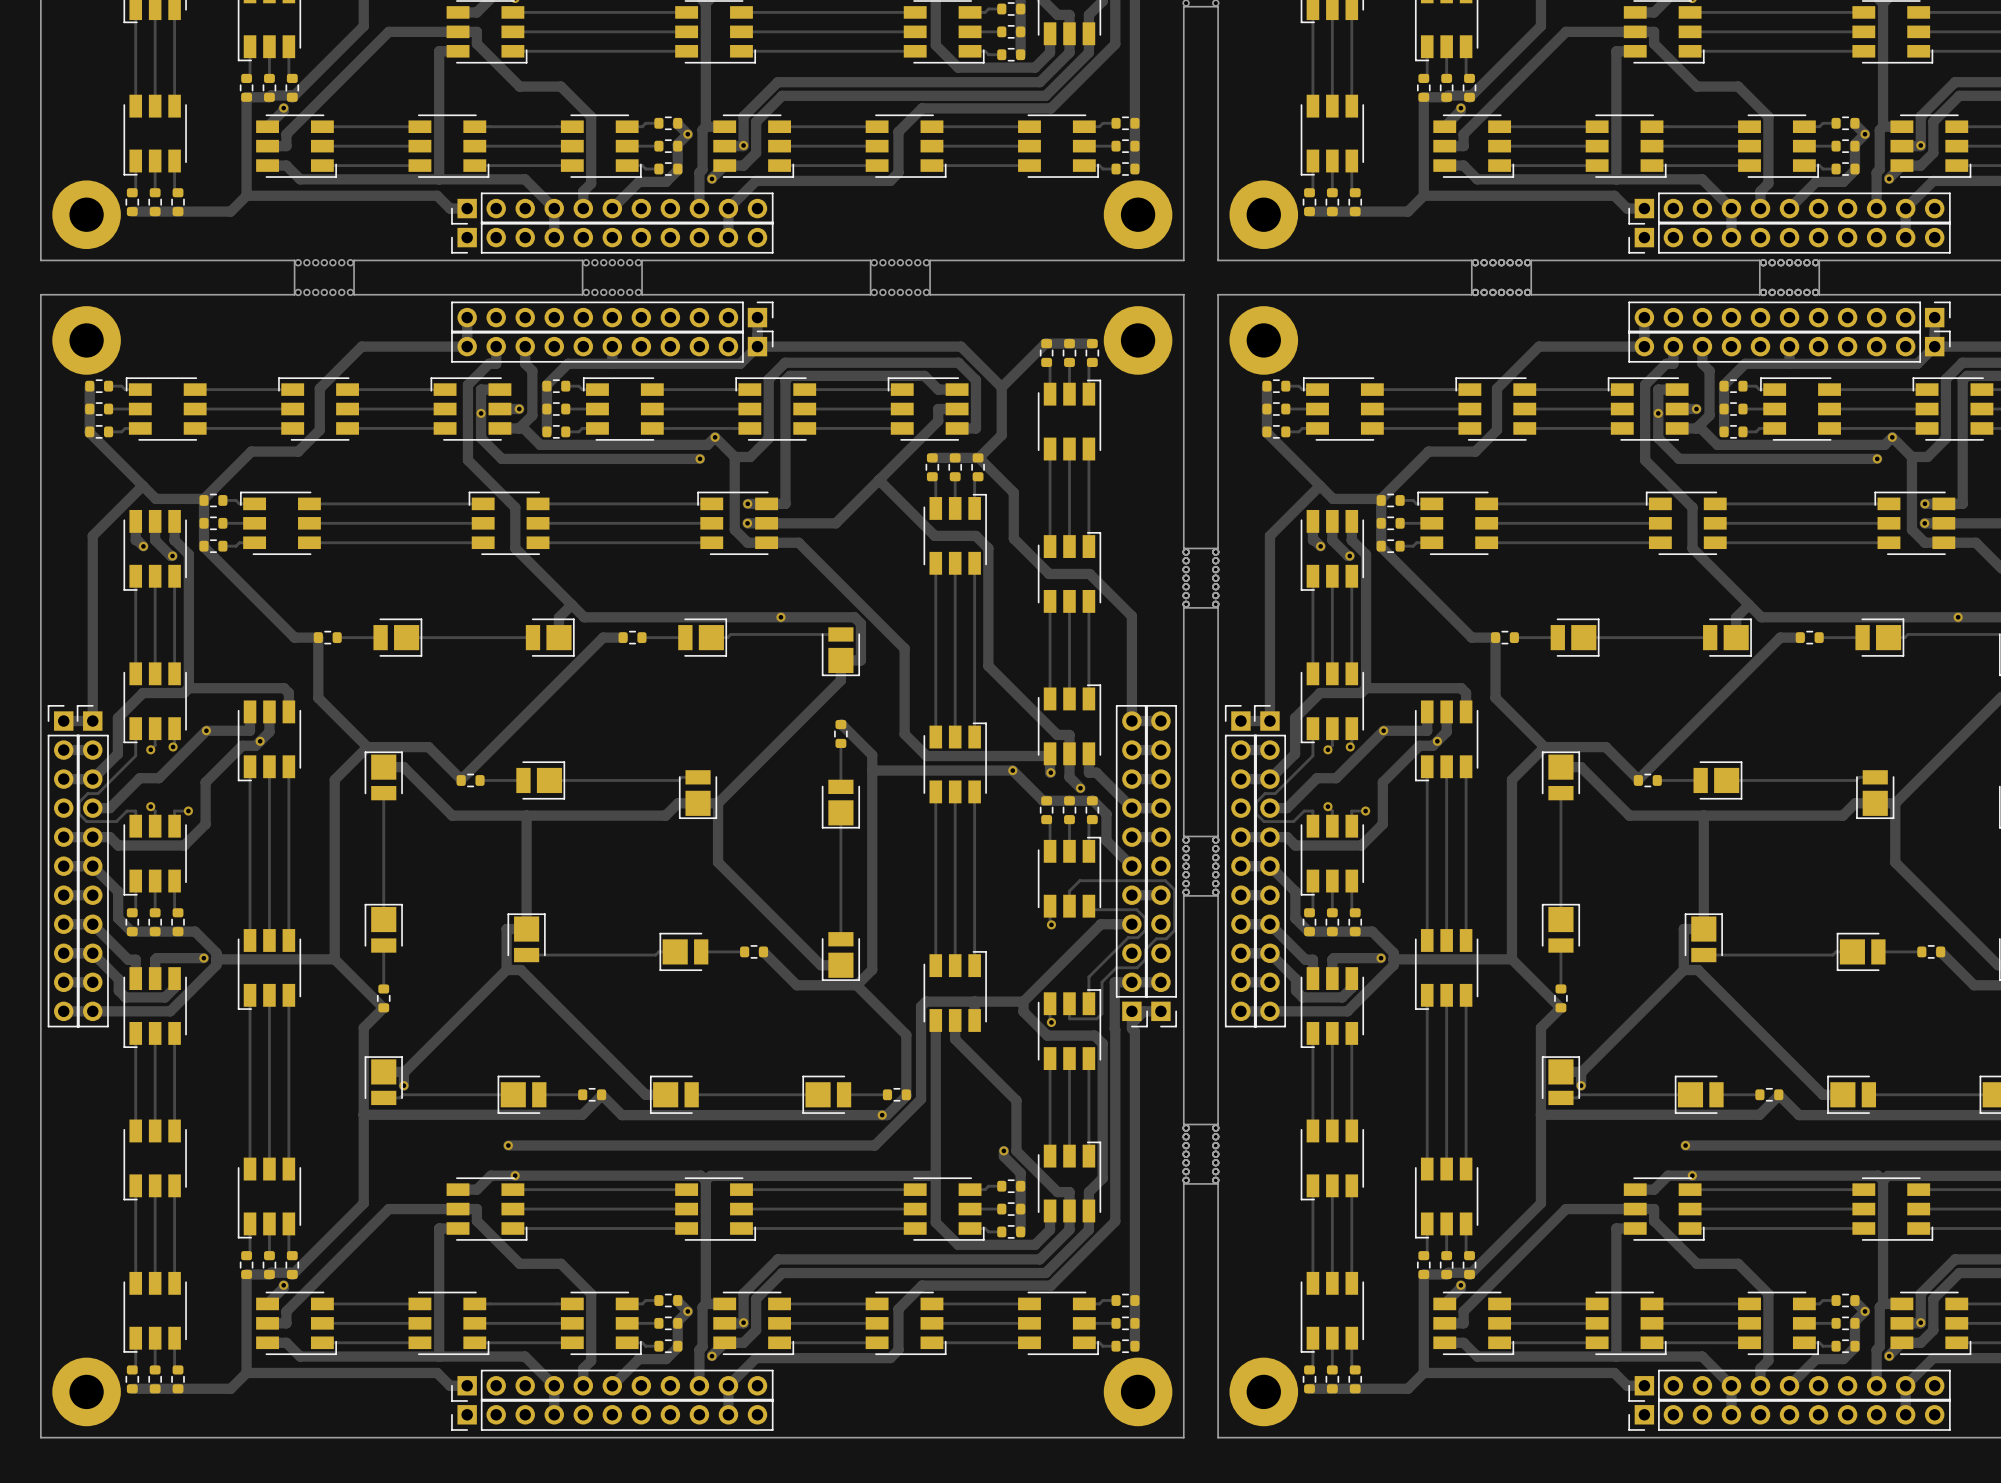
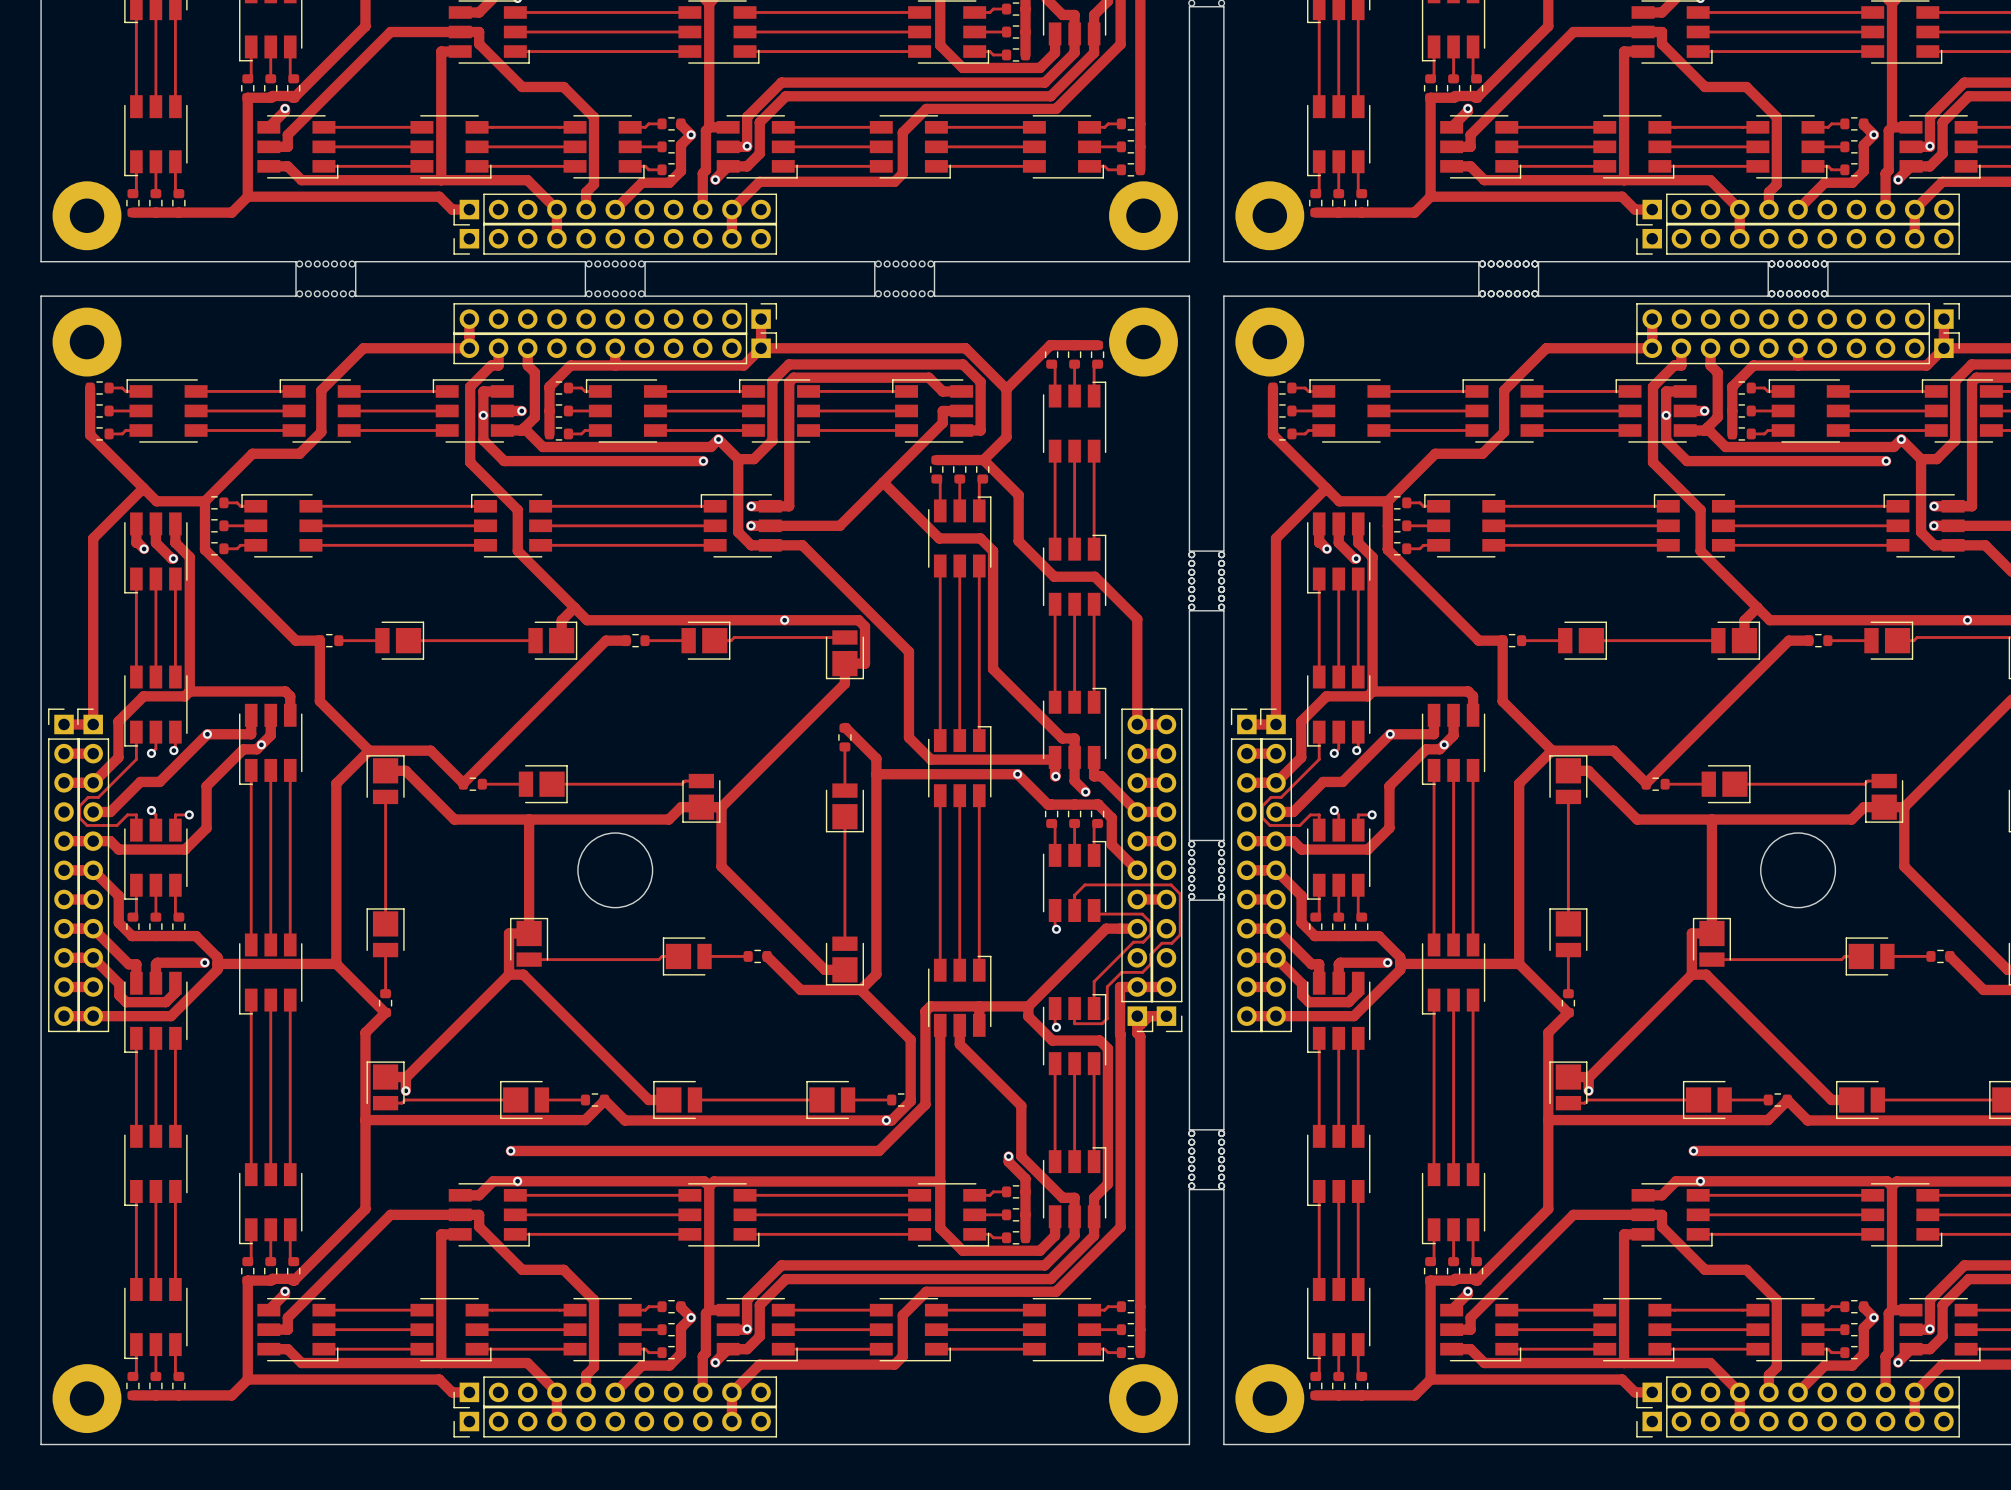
round board edge: none -> [577, 832, 654, 909]
round board edge: none -> [1760, 832, 1836, 909]

